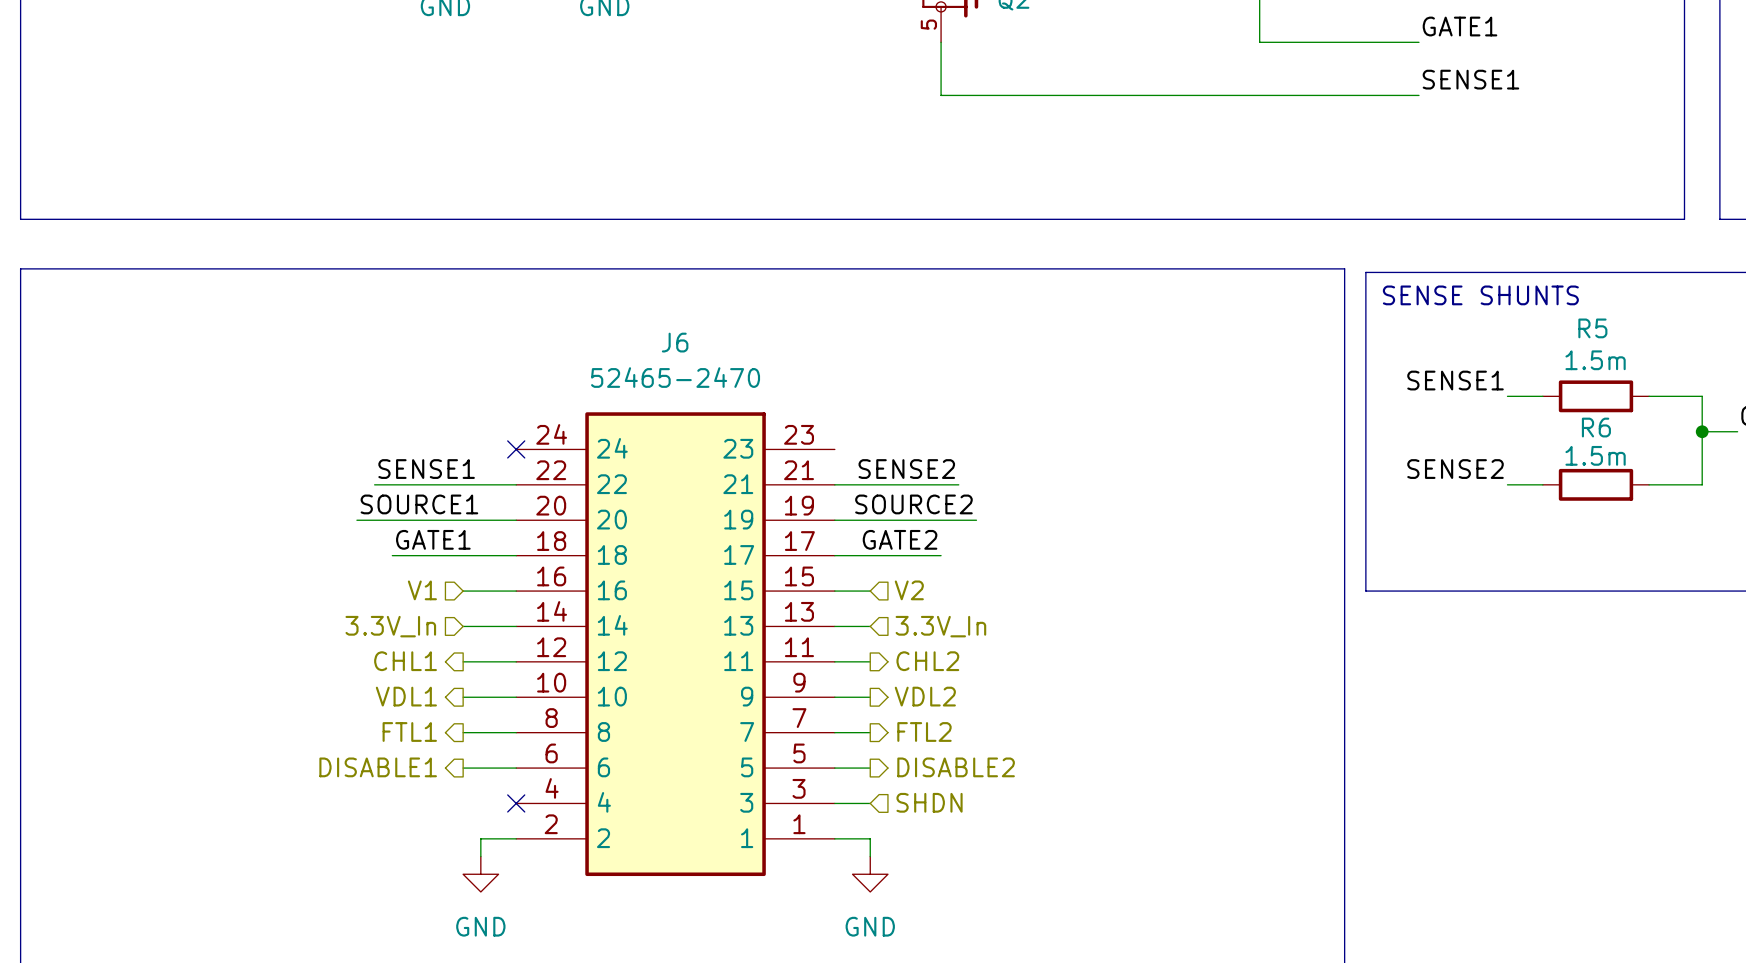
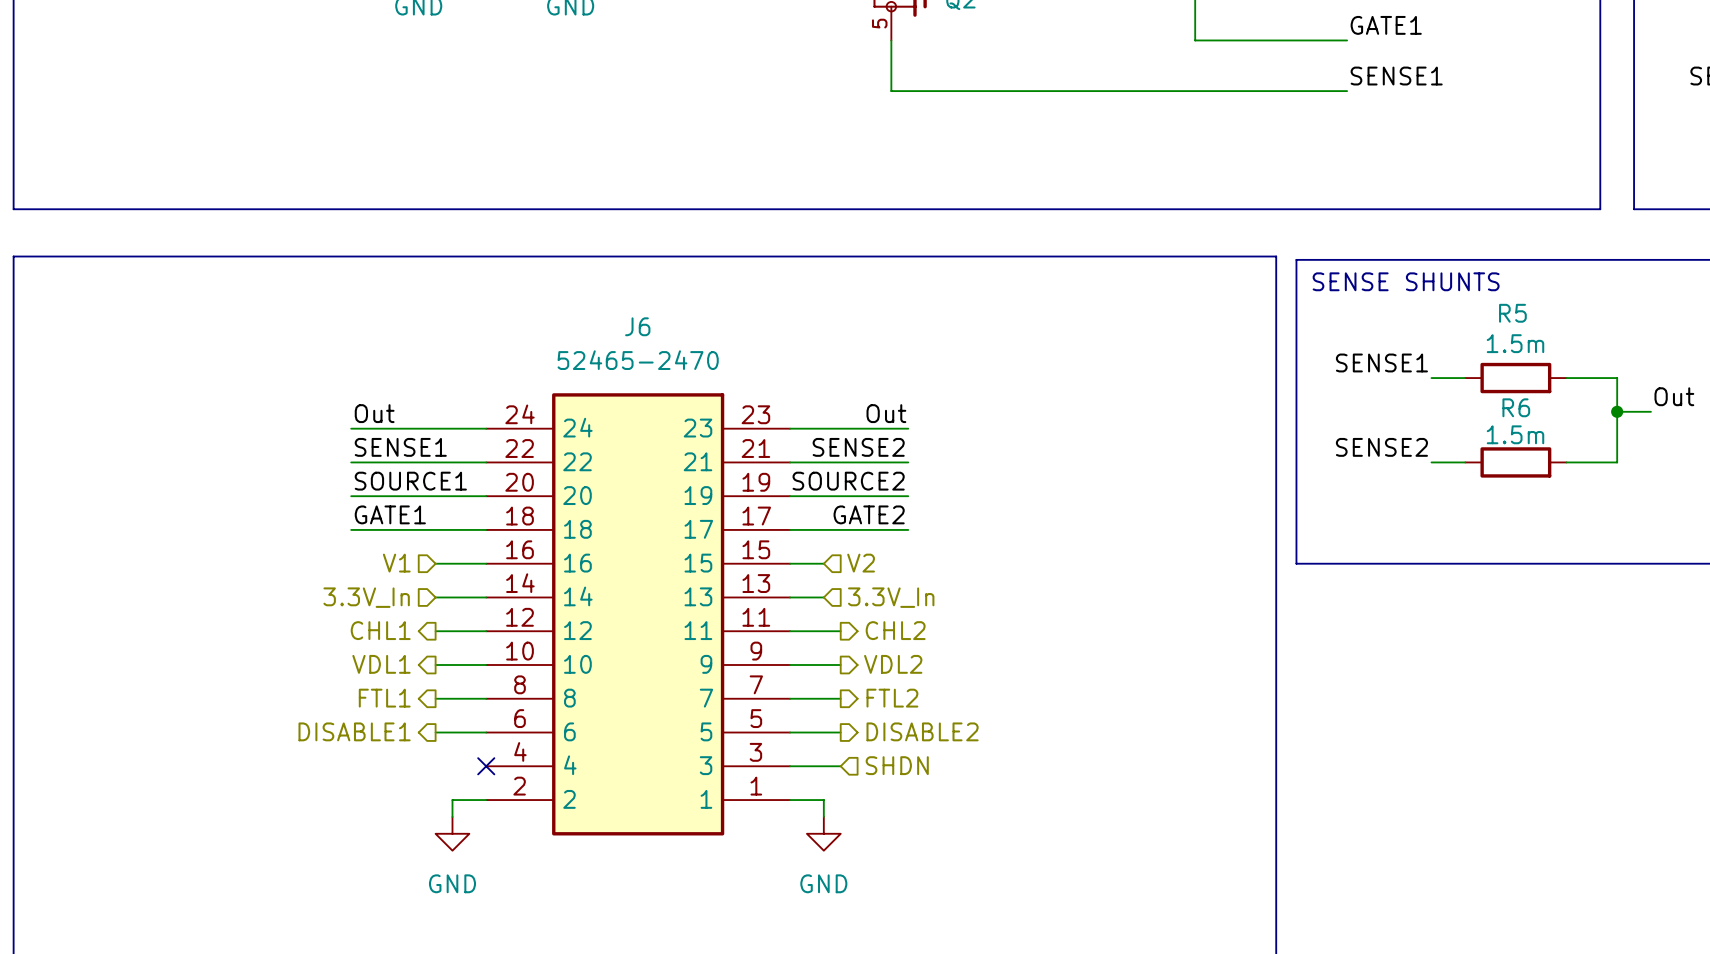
label: none -> Out (374, 413)
label: none -> Out (886, 413)
wire: none -> (351, 428) (486, 428)
no-connect mark: (516, 449) -> none
wire: none -> (790, 428) (908, 428)
label position: SOURCE1 (419, 504) -> SOURCE1 (410, 481)
label position: SOURCE2 (913, 504) -> SOURCE2 (848, 481)
wire: (356, 520) (374, 520) -> (351, 529) (368, 529)
wire: (958, 520) (976, 520) -> (891, 529) (908, 529)
label position: GATE1 (433, 539) -> GATE1 (390, 514)
label position: GATE2 (900, 539) -> GATE2 (869, 514)
wire: none -> (823, 631) (840, 631)
hierarchical label position: CHL2 (927, 661) -> CHL2 (895, 630)
hierarchical label position: VDL2 (925, 696) -> VDL2 (893, 664)
wire: none -> (823, 664) (840, 664)
hierarchical label position: FTL2 (924, 731) -> FTL2 (892, 698)
wire: none -> (823, 698) (840, 698)
hierarchical label position: DISABLE2 (956, 767) -> DISABLE2 (922, 731)
wire: none -> (823, 732) (840, 732)
hierarchical label position: SHDN (929, 802) -> SHDN (897, 765)
wire: none -> (823, 766) (840, 766)

